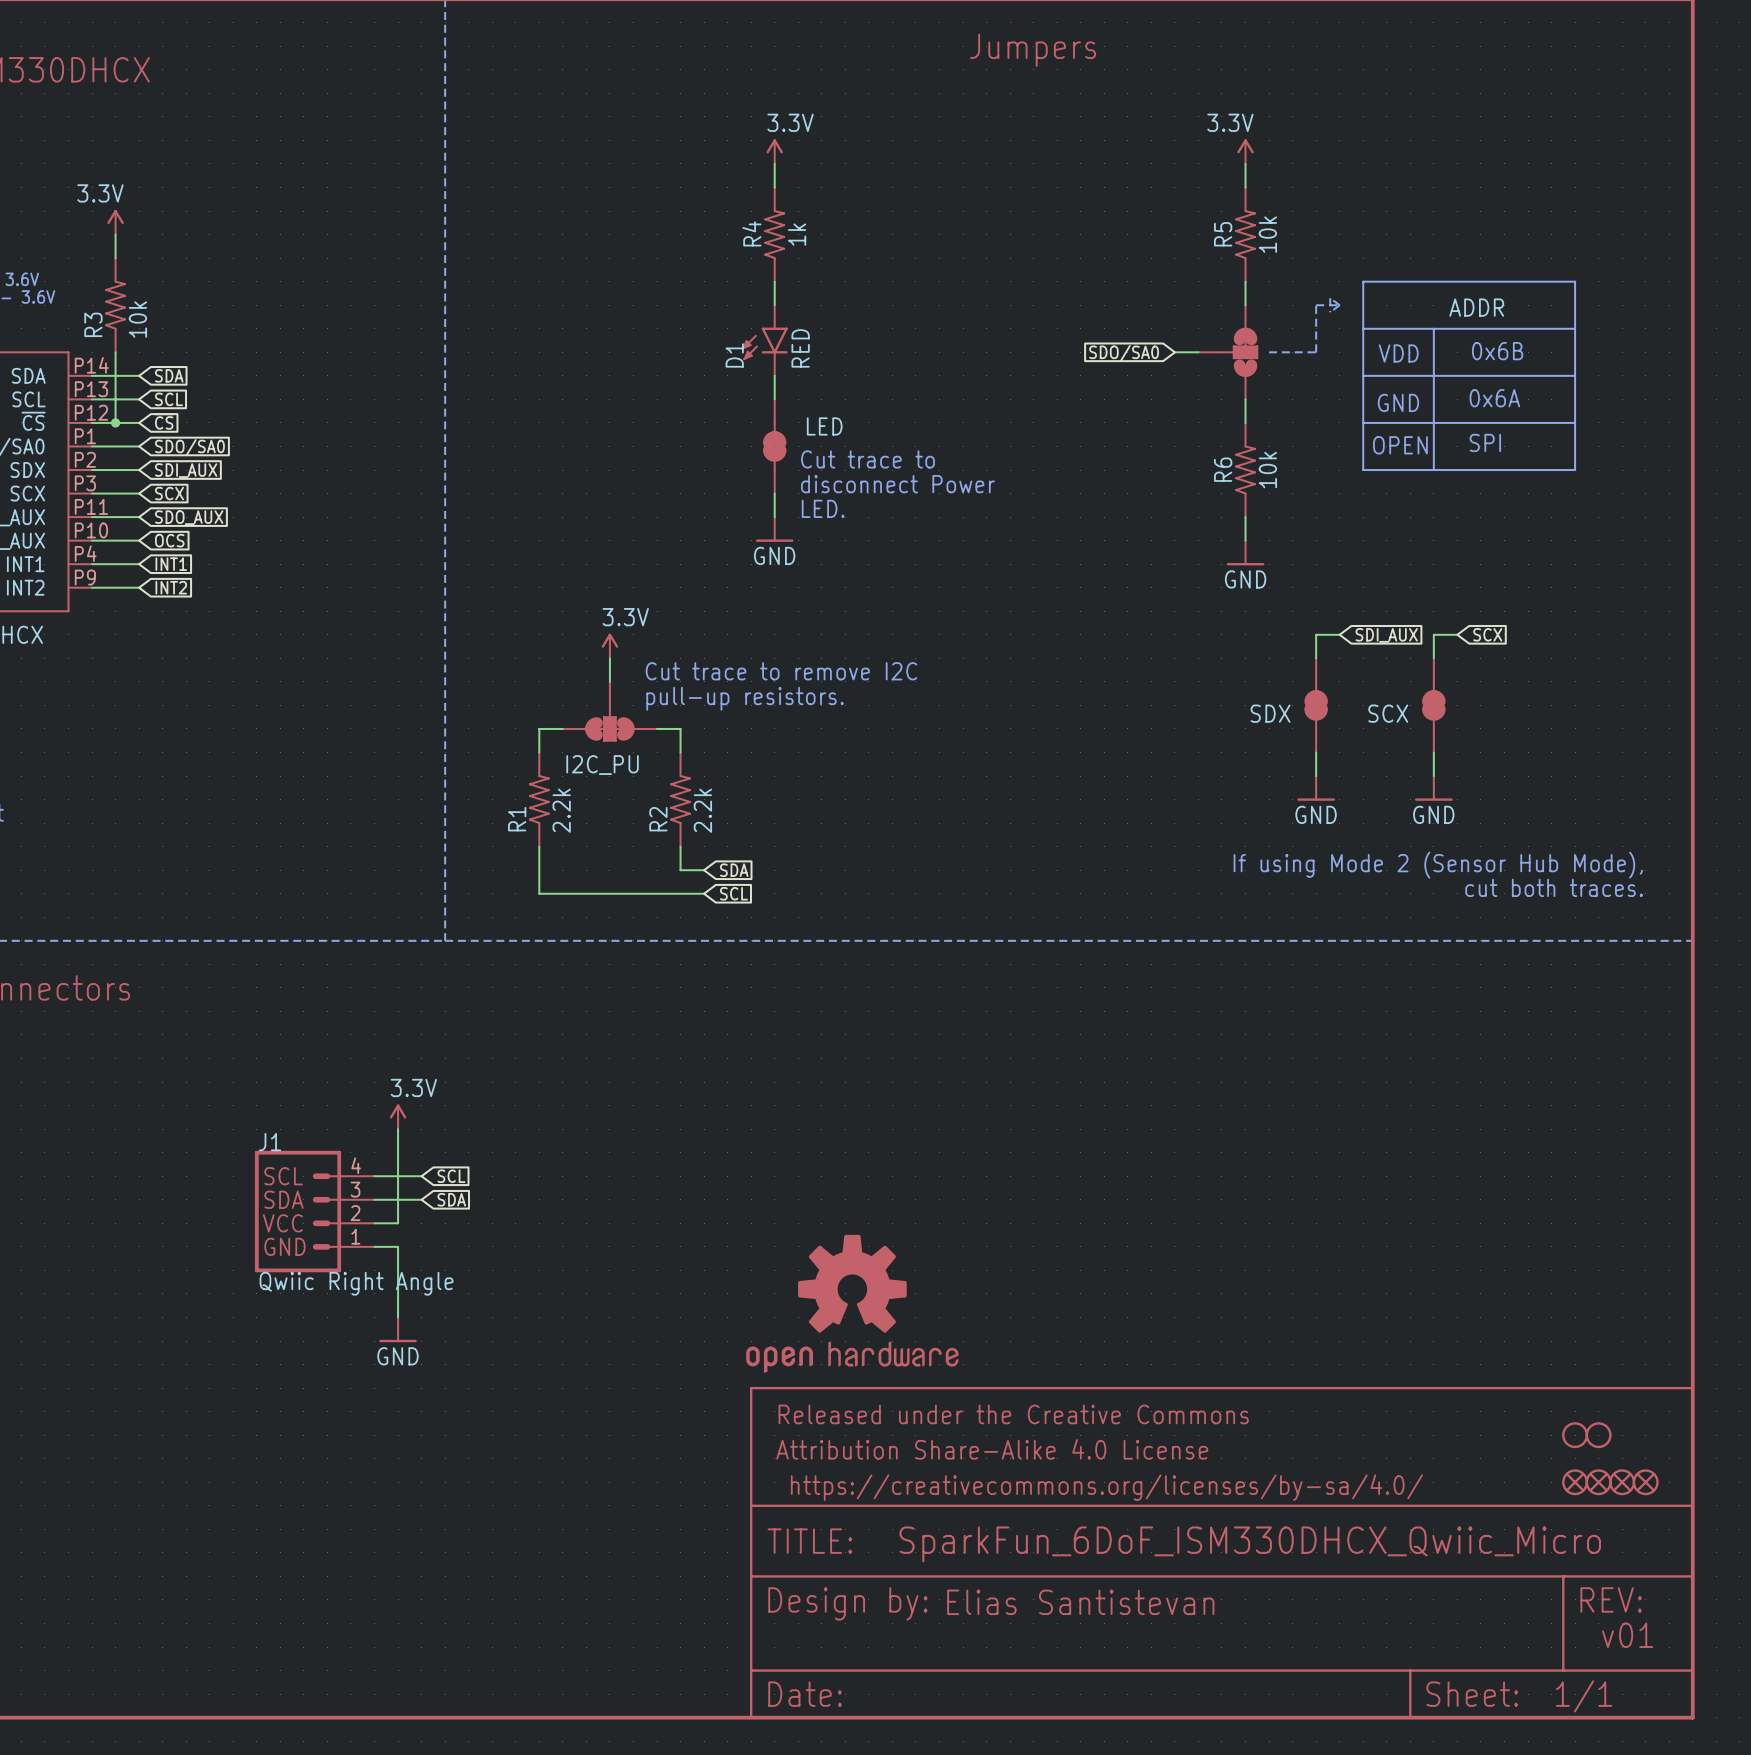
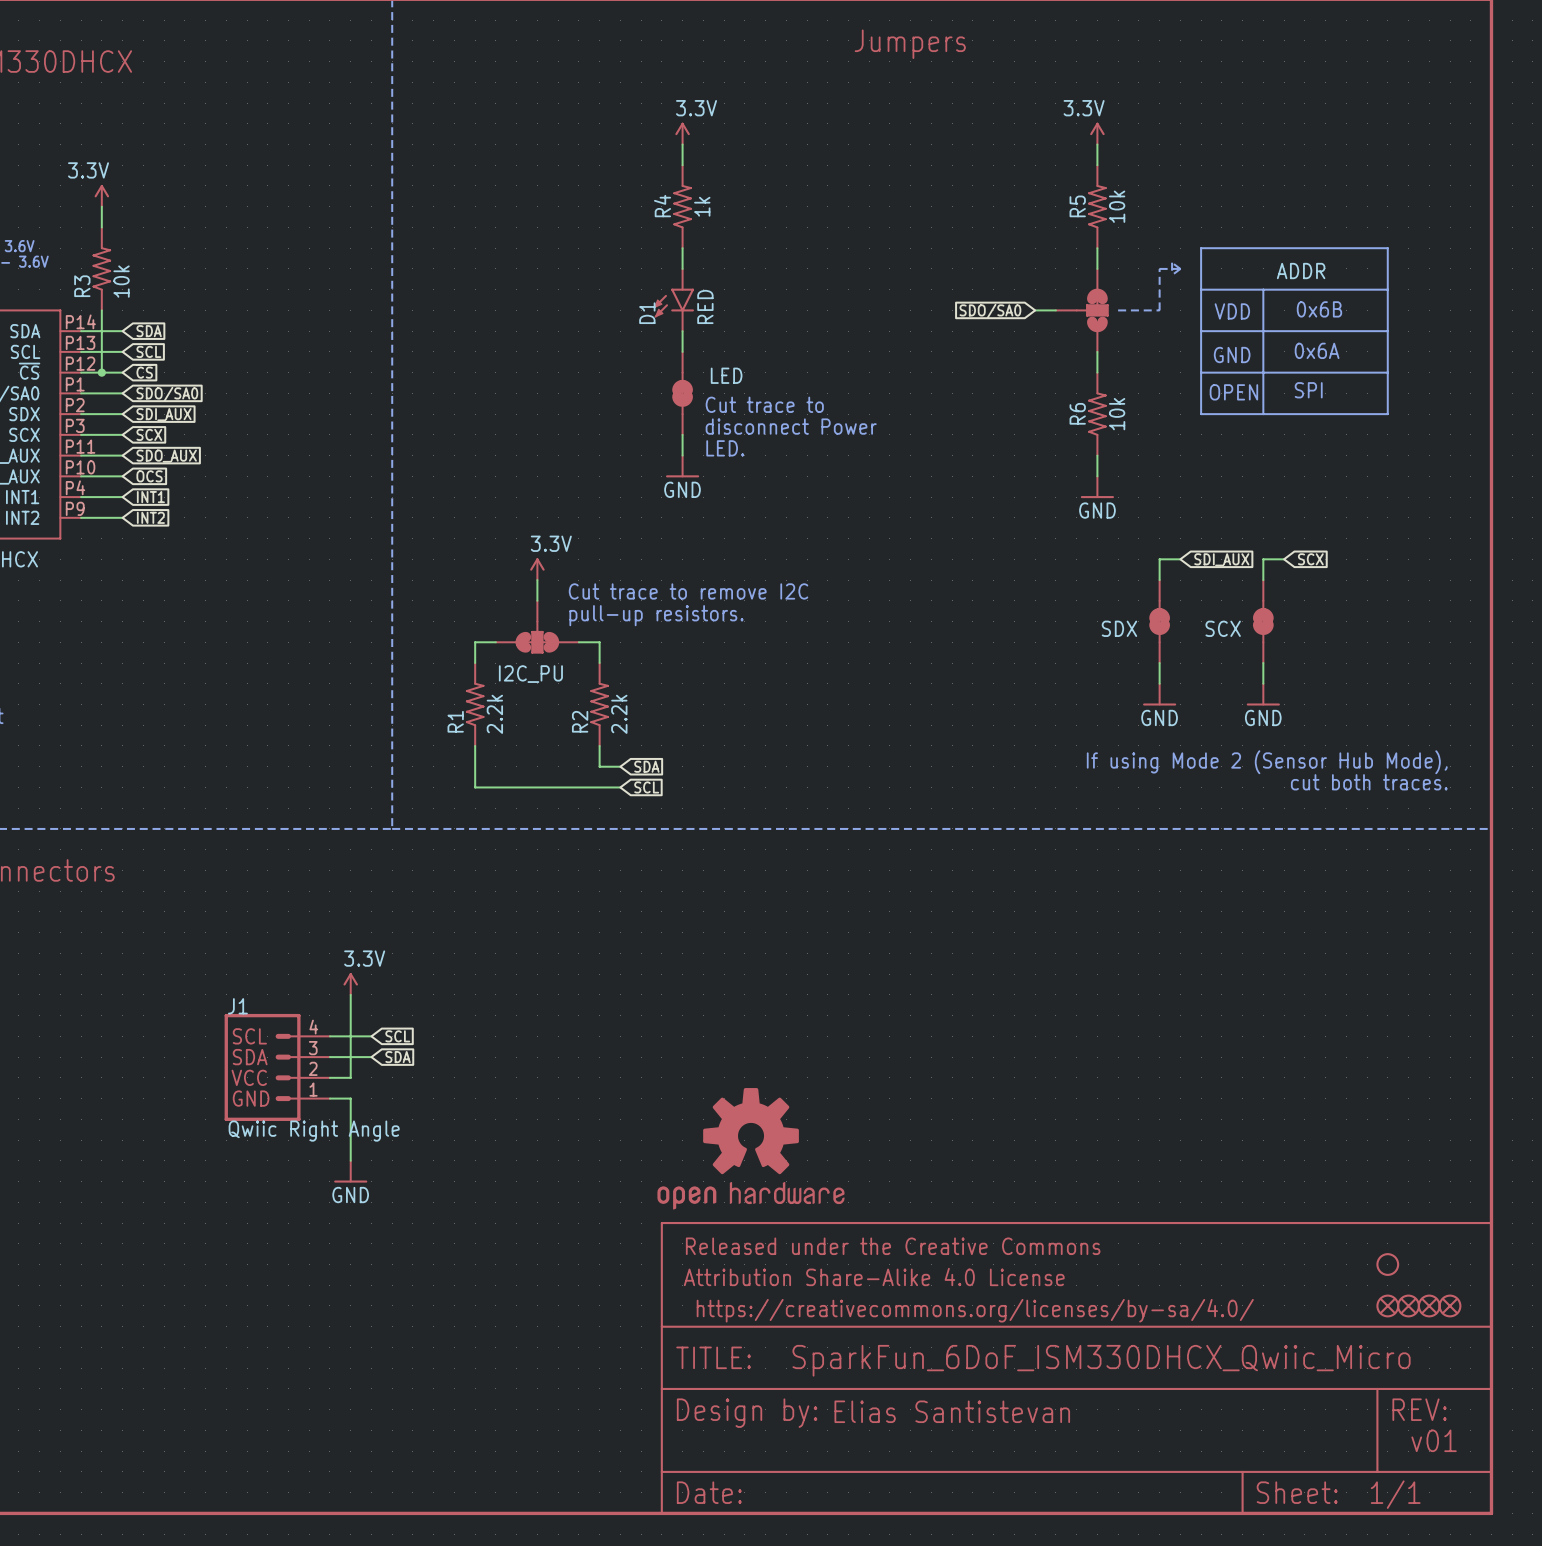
part: (1598, 1435) -> none

